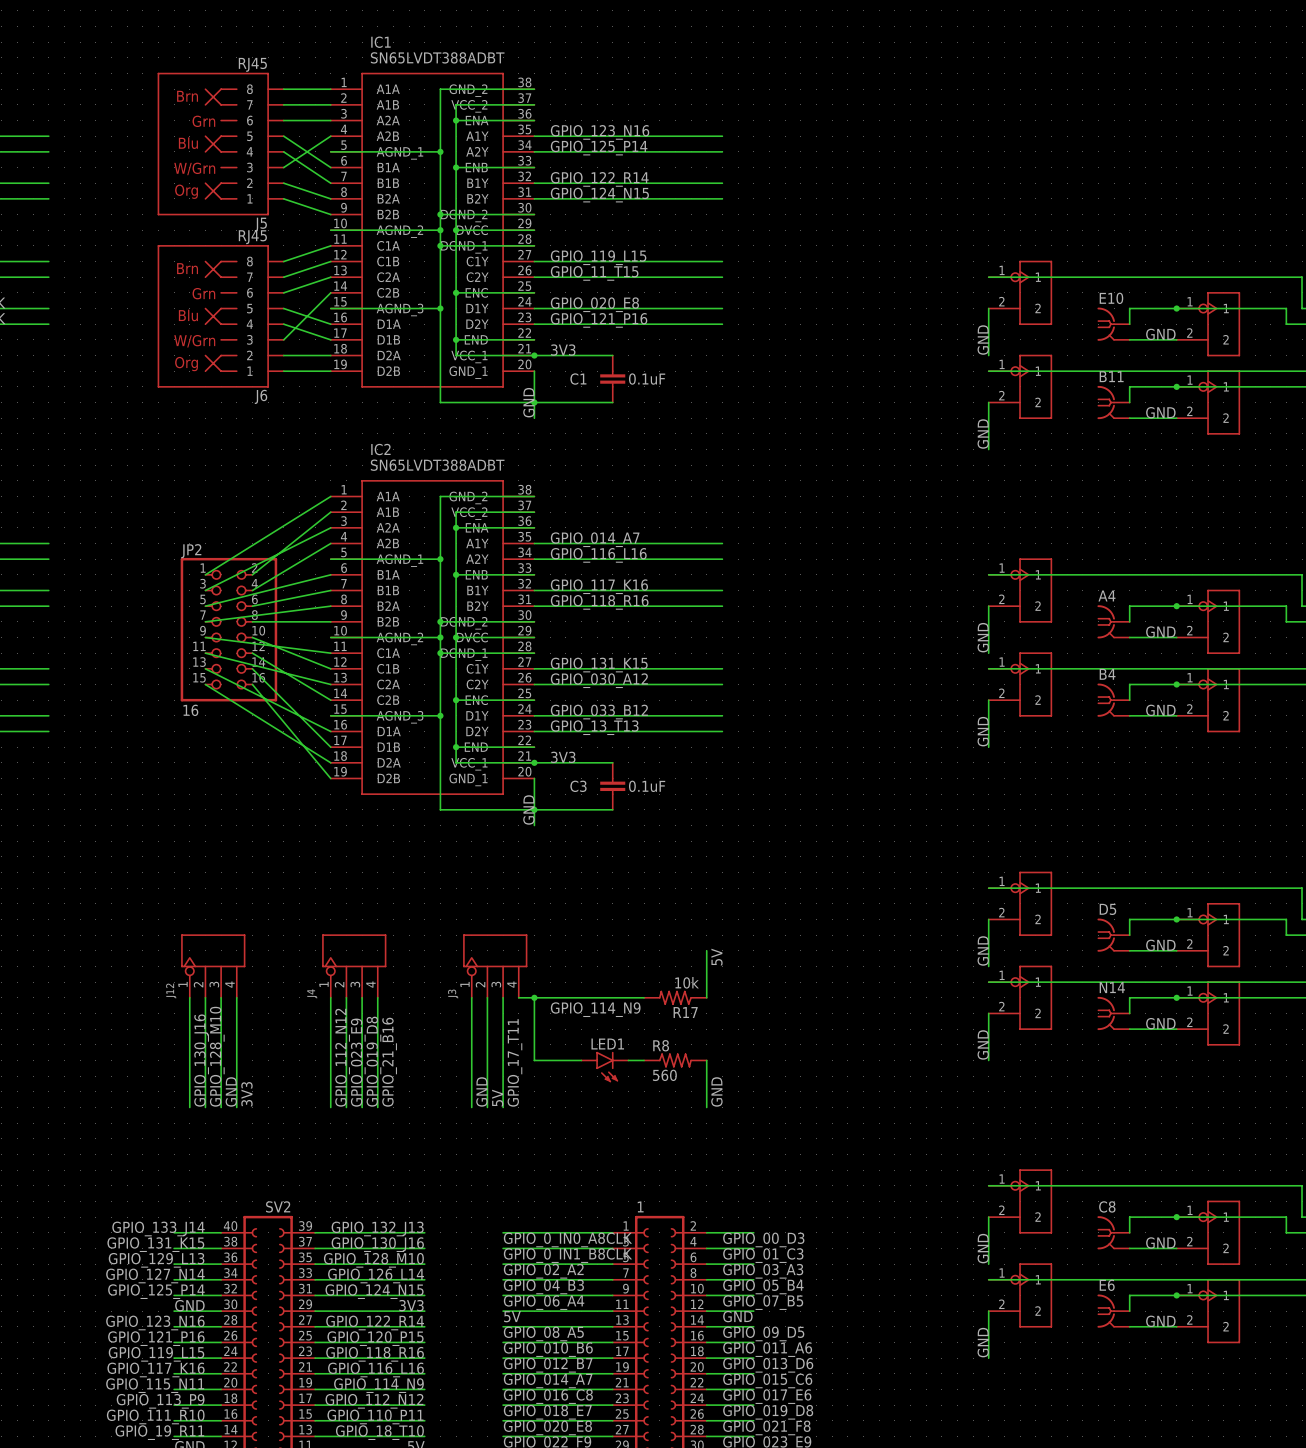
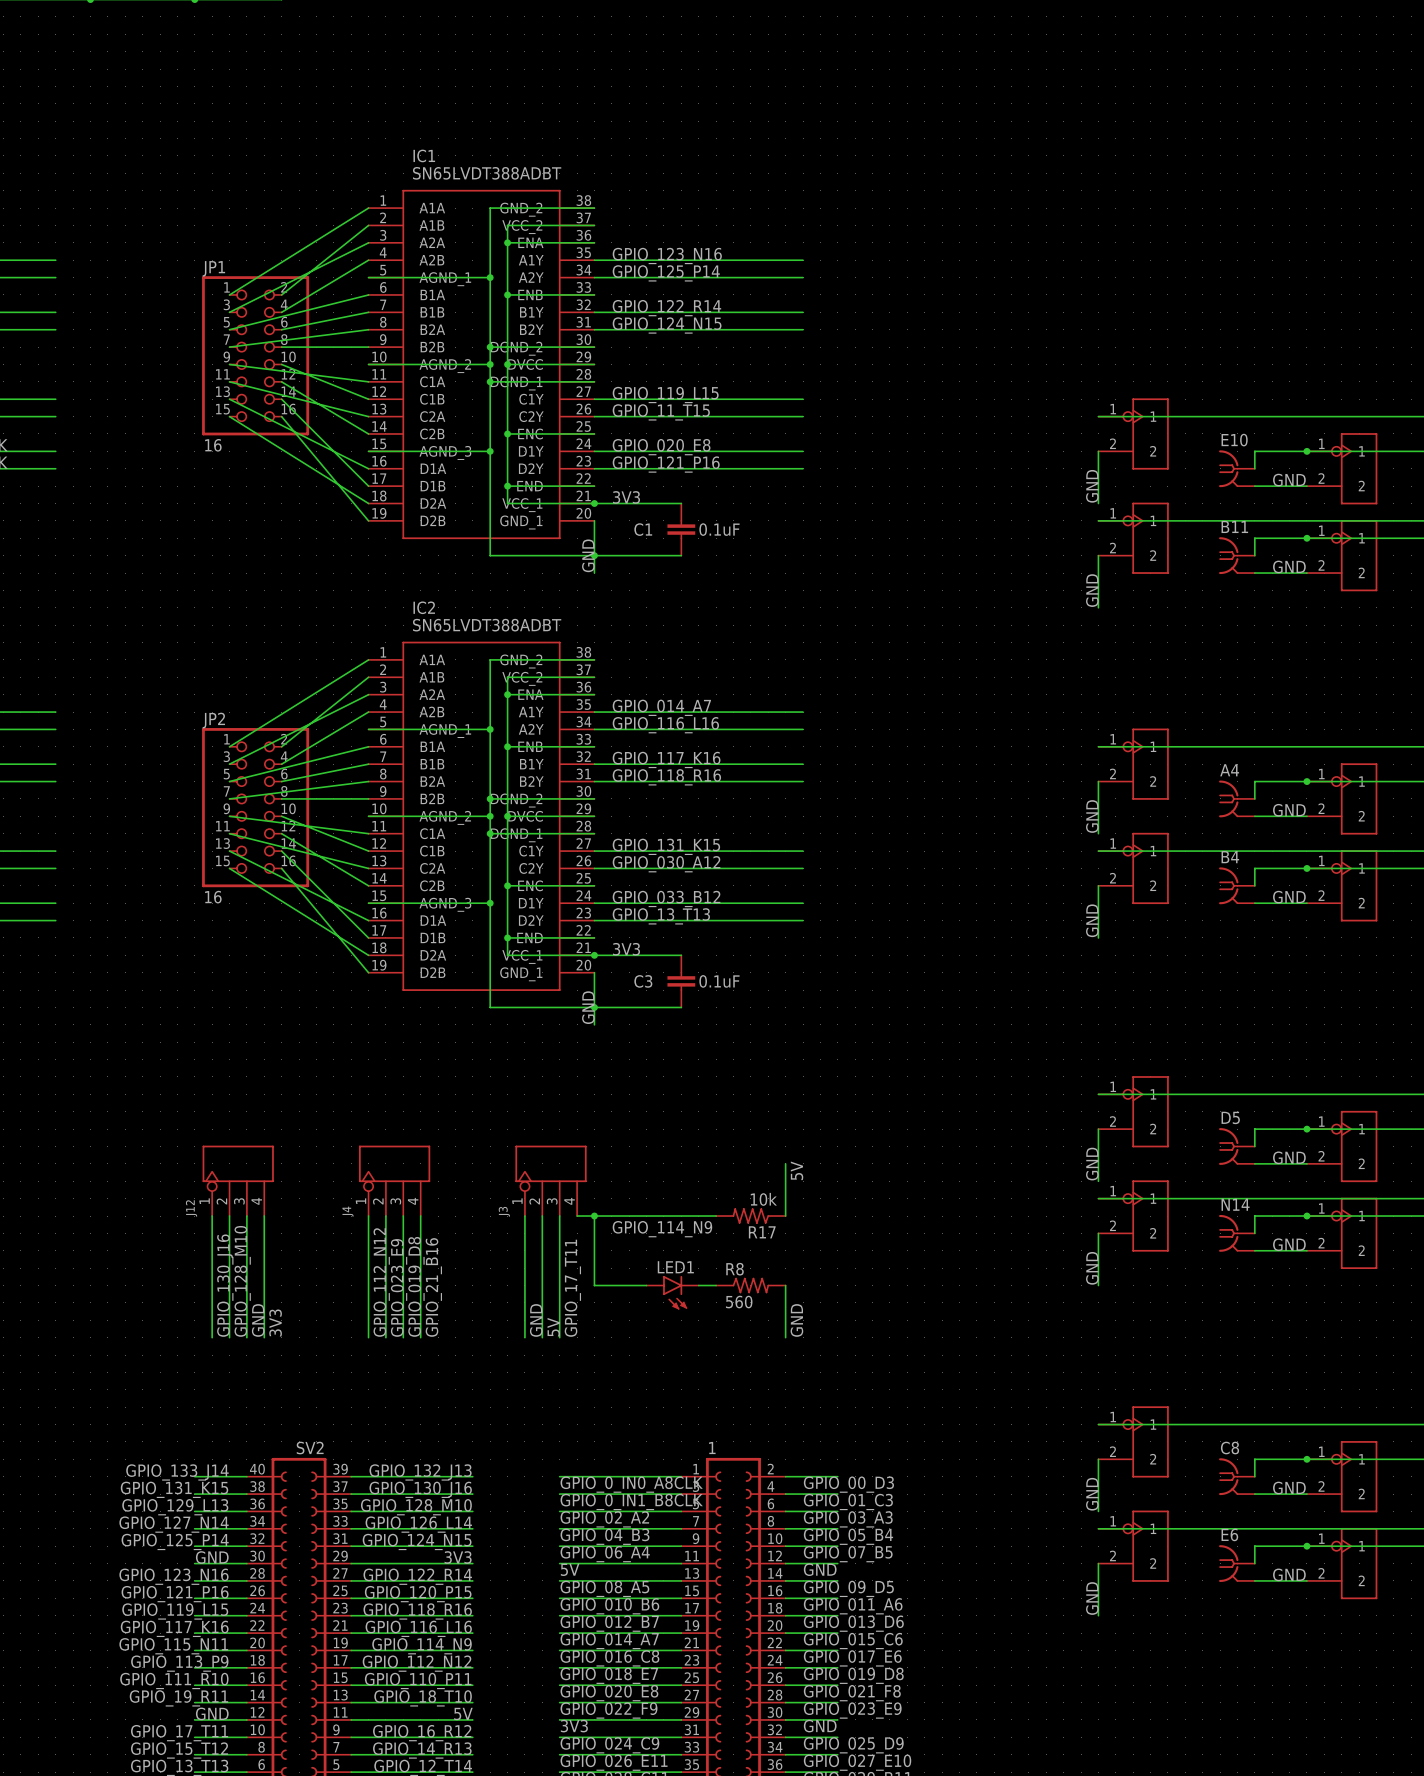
wire: (283, 89) (330, 89) -> (229, 294) (368, 208)
wire: (283, 104) (330, 104) -> (281, 294) (368, 225)
wire: (283, 120) (330, 120) -> (229, 312) (368, 242)
wire: (283, 136) (330, 167) -> (229, 329) (368, 294)
wire: (330, 136) (283, 167) -> (368, 260) (281, 312)
J5: RJ45 (220, 144) -> none
wire: (283, 151) (330, 183) -> (281, 329) (368, 312)
wire: (283, 183) (330, 198) -> (229, 347) (368, 329)
wire: (283, 198) (330, 214) -> (281, 347) (368, 347)
JP1: none -> 16 (255, 355)
wire: (330, 245) (283, 261) -> (368, 381) (229, 364)
wire: (330, 261) (283, 277) -> (368, 399) (281, 364)
wire: (330, 277) (283, 292) -> (368, 416) (229, 381)
wire: (330, 292) (283, 339) -> (368, 433) (281, 381)
wire: (283, 308) (330, 324) -> (229, 399) (368, 468)
J6: RJ45 (220, 316) -> none
wire: (283, 324) (330, 339) -> (281, 399) (368, 486)
wire: (283, 355) (330, 355) -> (229, 416) (368, 503)
wire: (283, 371) (330, 371) -> (281, 416) (368, 520)

